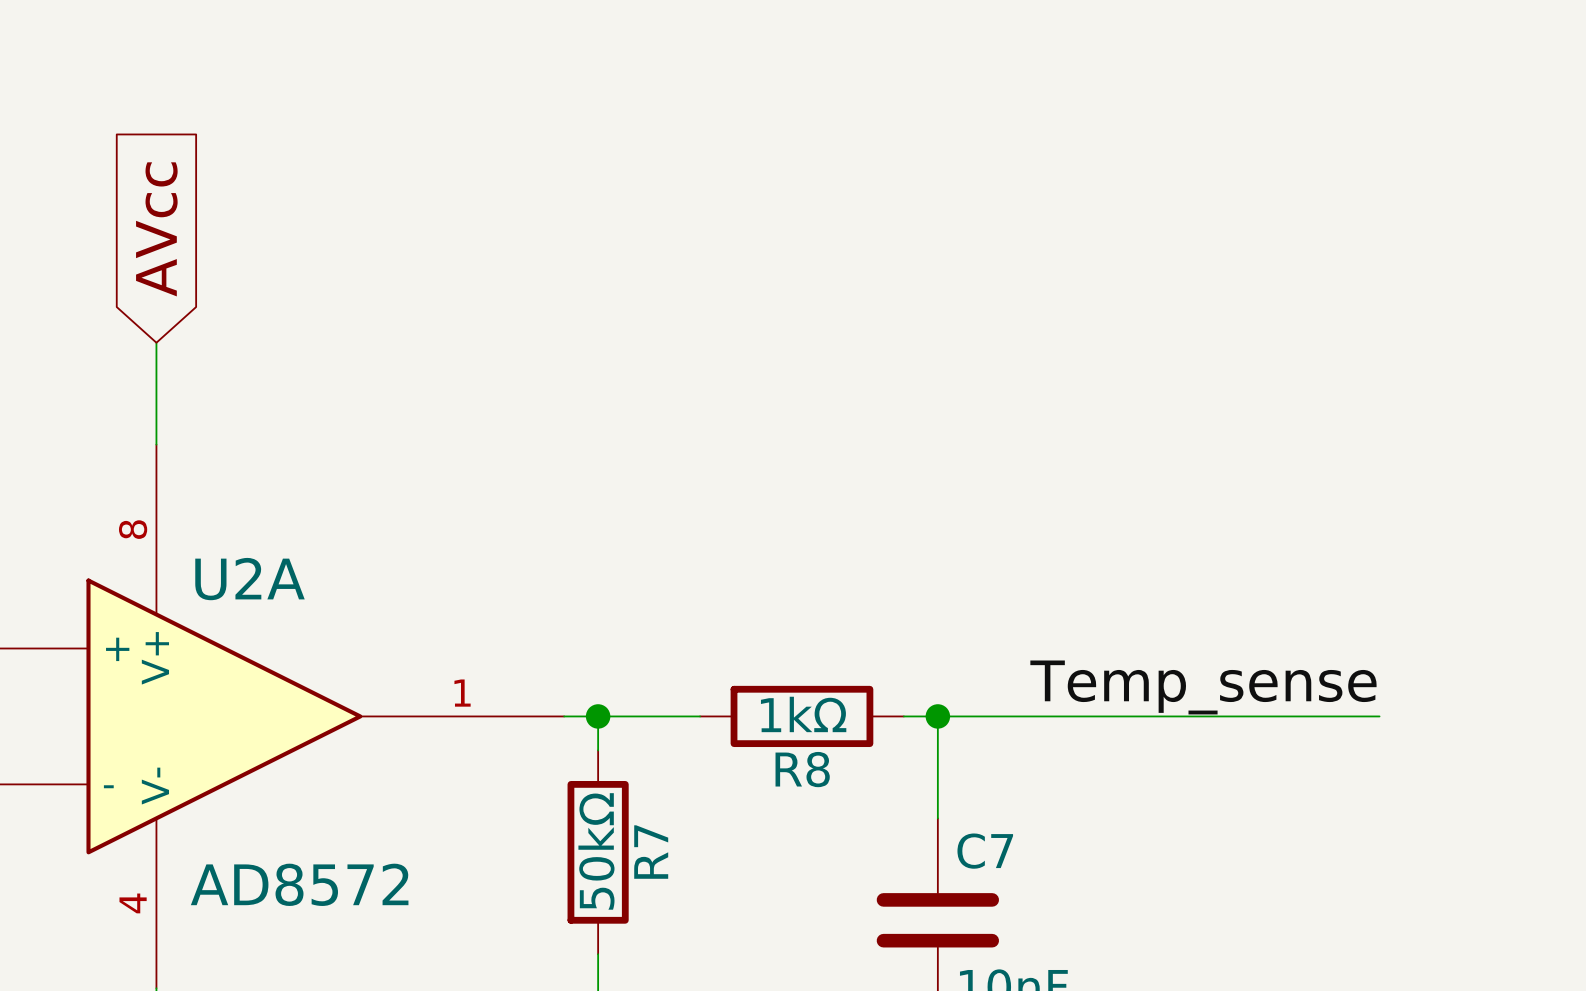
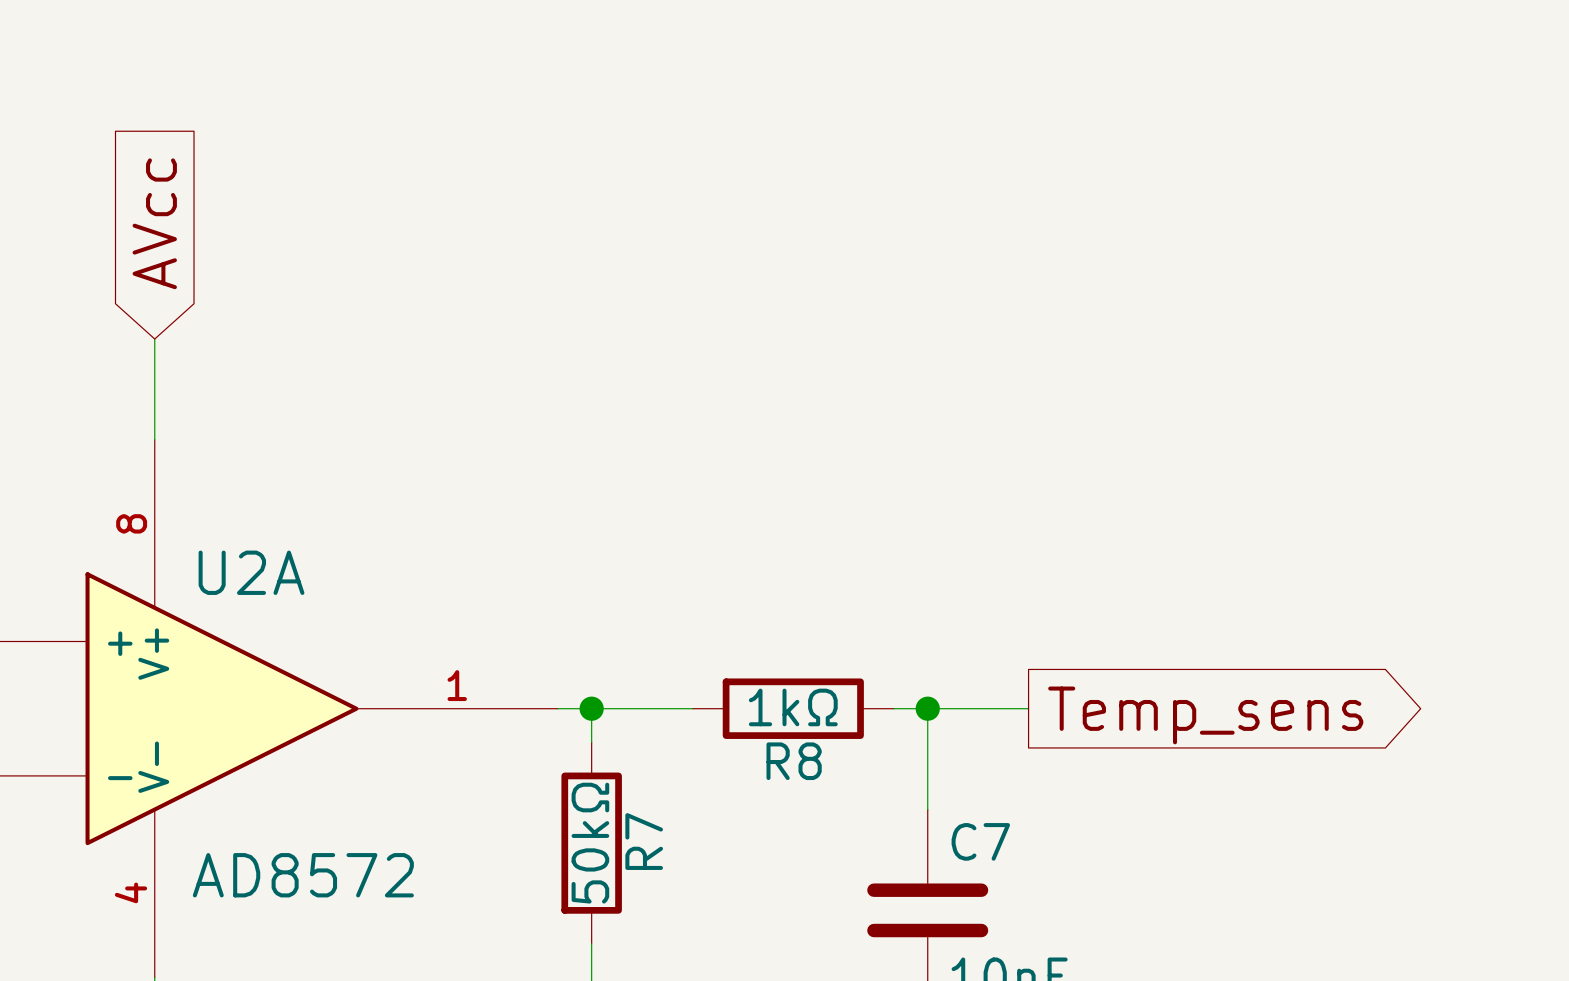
label: Temp_sense (1203, 687) -> none
wire: (1039, 716) (1379, 716) -> none
global label: none -> Temp_sens (1205, 715)

